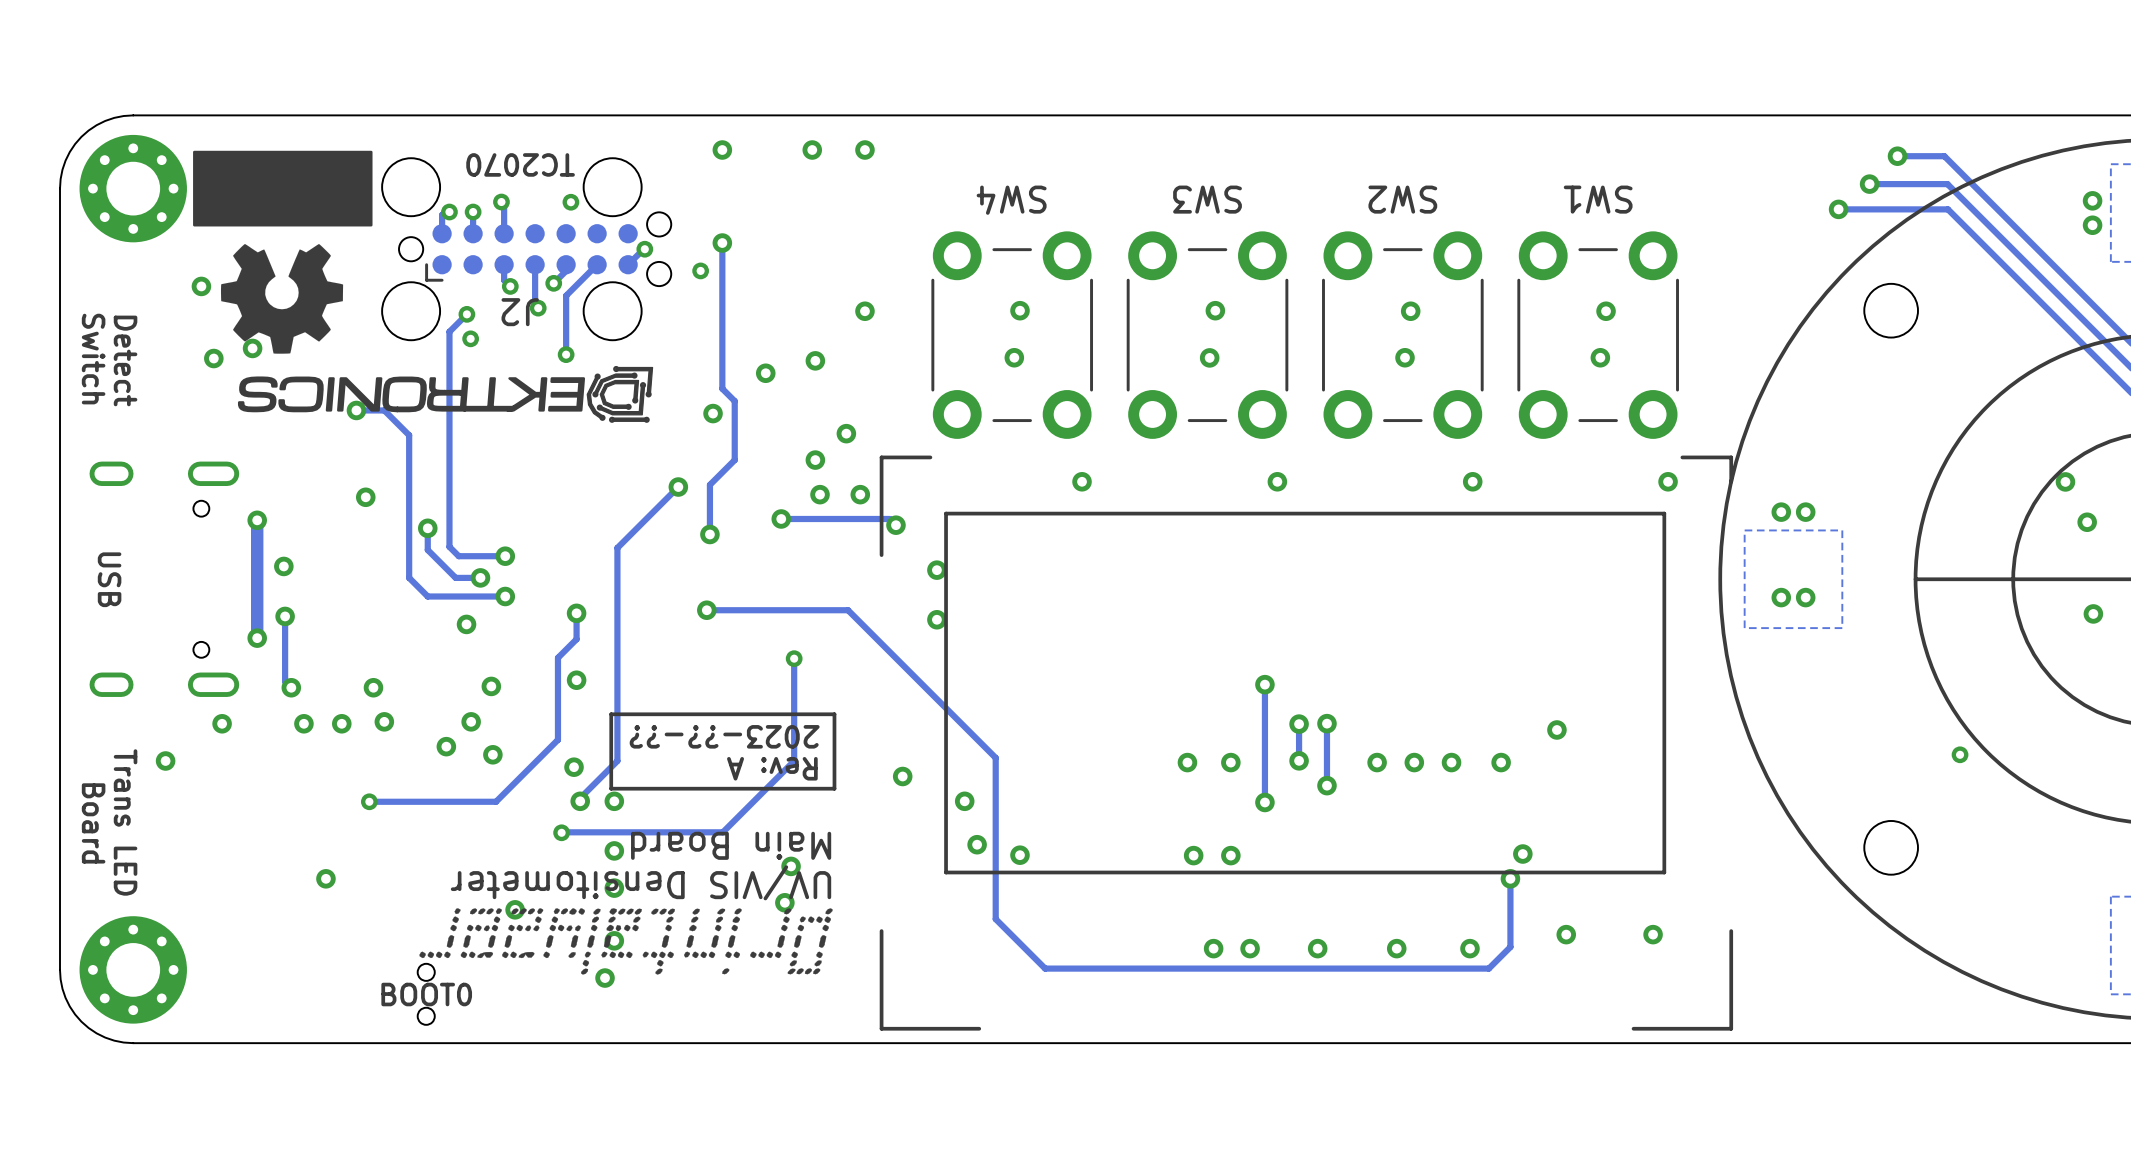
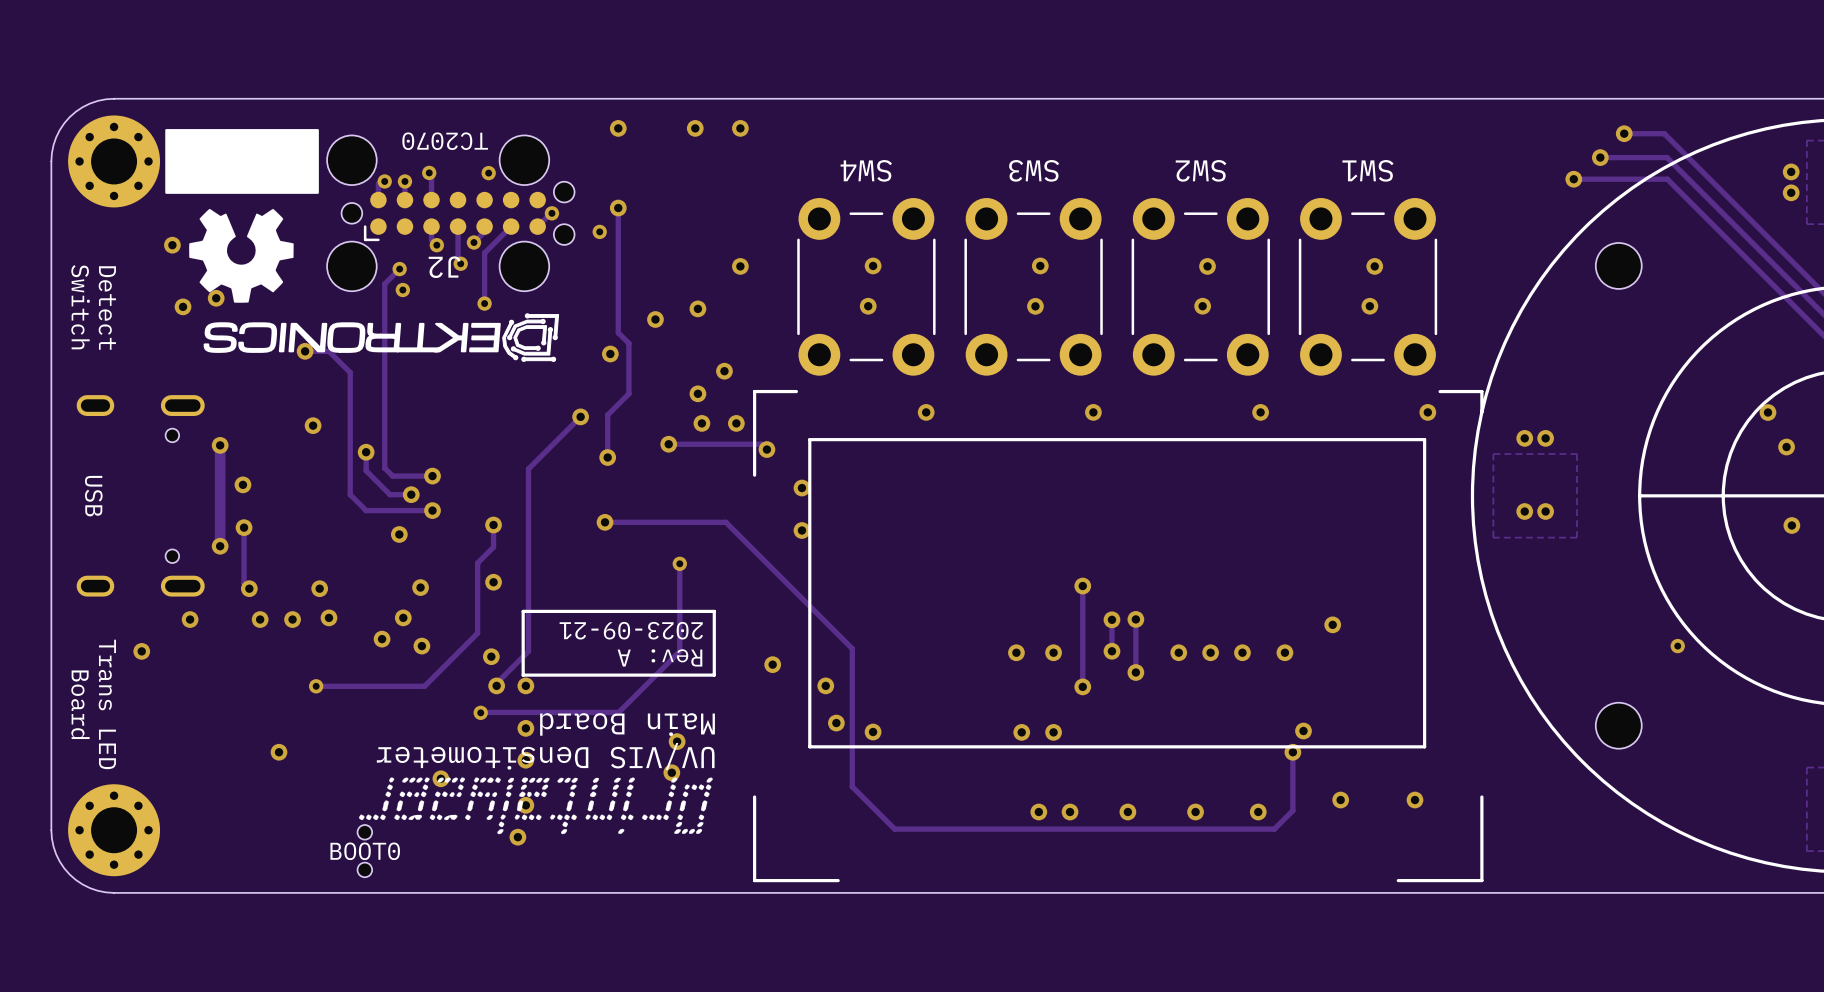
text: 2023-??-?? (724, 736) -> 2023-09-21 (631, 630)

